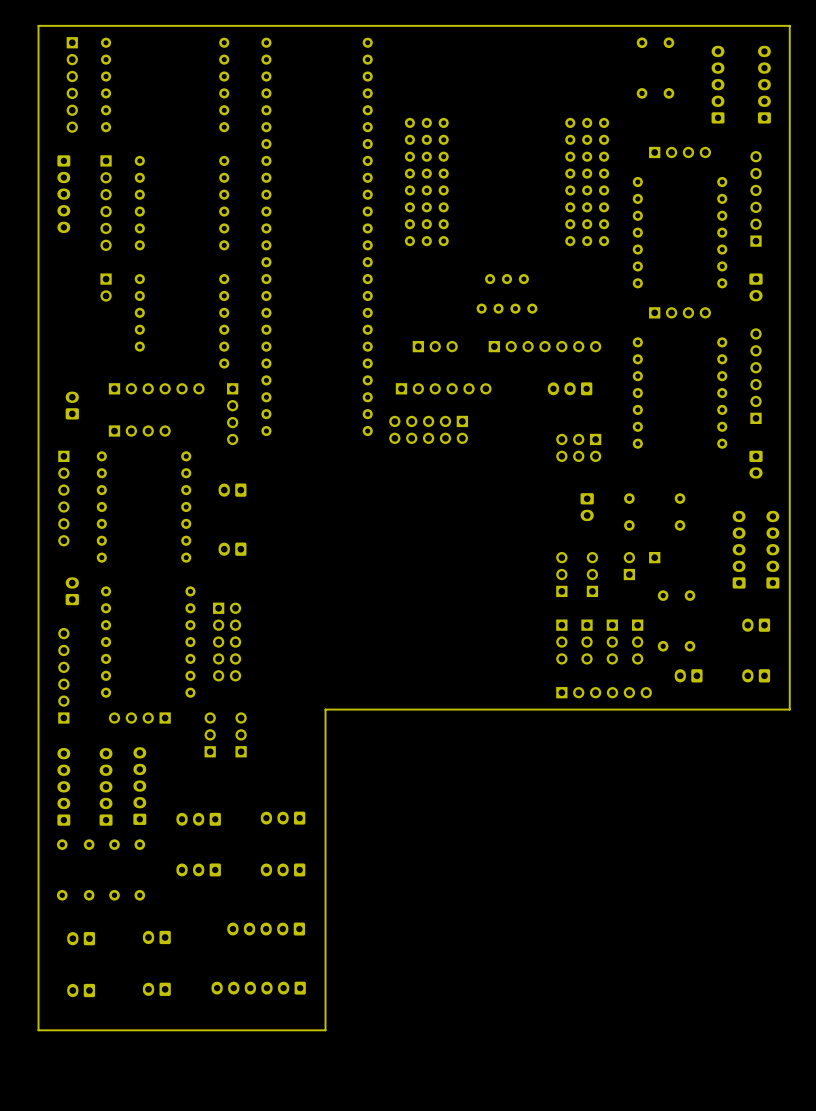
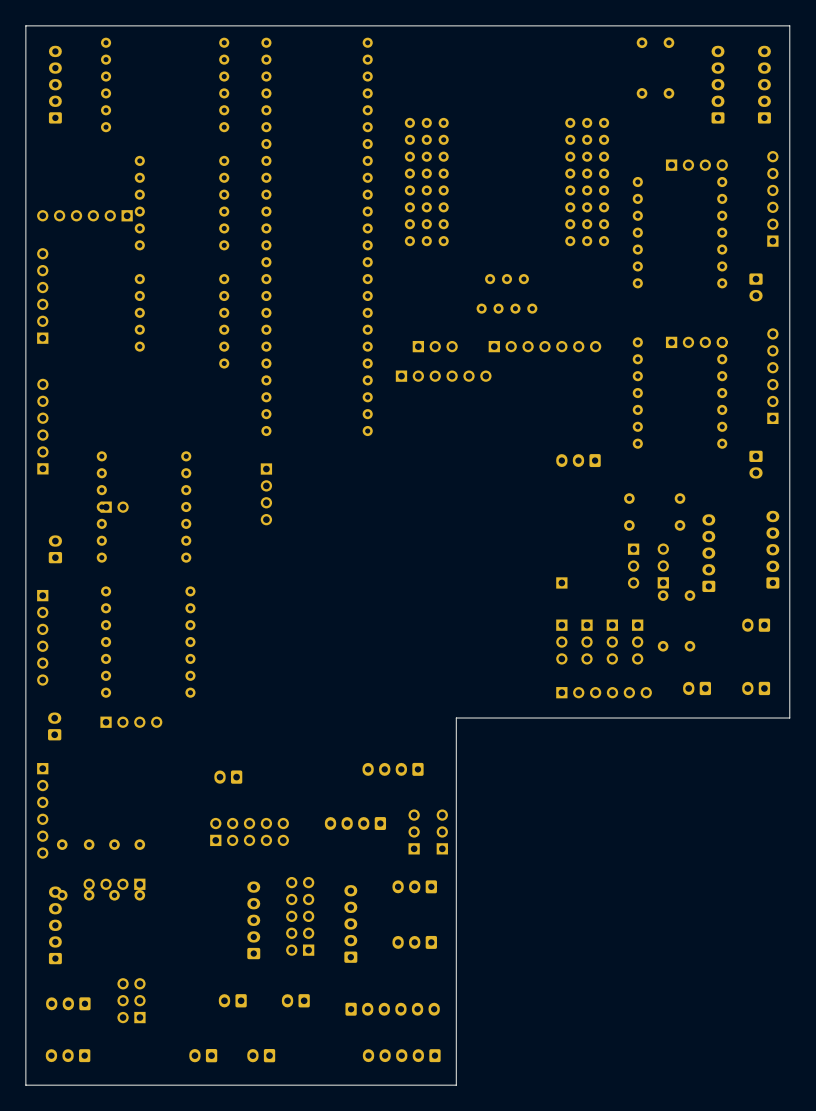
board edge: (38, 25) (38, 1030) (325, 1030) (325, 709) (789, 709) -> (38, 25) (25, 25) (25, 1085) (456, 1085) (456, 718) (789, 718) (789, 709)
part: (72, 84) -> none
part position: (680, 152) -> (696, 165)
part rotation: 0° (63, 194) -> 180° (55, 84)
part position: (63, 194) -> (55, 84)
part position: (755, 198) -> (772, 198)
part rotation: 0° (106, 203) -> 90° clockwise (84, 215)
part: (106, 287) -> none
part: none -> (42, 295)
part position: (680, 312) -> (696, 342)
part position: (755, 376) -> (772, 376)
part: (156, 388) -> none
part position: (443, 388) -> (443, 376)
part position: (570, 388) -> (578, 460)
part: (72, 405) -> none
part: (232, 414) -> none
part: none -> (42, 426)
part: (428, 429) -> none
part: (139, 431) -> none
part: (578, 447) -> none
part: (232, 490) -> none
part: none -> (266, 494)
part: (63, 498) -> none
part: none -> (114, 507)
part: (587, 507) -> none
part: (232, 549) -> none
part position: (739, 549) -> (708, 553)
part footprint: [623, 551, 636, 581] -> [627, 543, 640, 589]
part position: (654, 557) -> (561, 582)
part: none -> (663, 565)
part: (561, 574) -> none
part: (592, 574) -> none
part position: (72, 591) -> (55, 549)
part: (227, 642) -> none
part rotation: 0° (63, 675) -> 180° (42, 637)
part position: (688, 675) -> (697, 688)
part position: (756, 675) -> (756, 688)
part rotation: 0° (139, 718) -> 180° (131, 722)
part: none -> (54, 726)
part: (210, 734) -> none
part: (241, 734) -> none
part: none -> (393, 769)
part: none -> (228, 777)
part: (63, 786) -> none
part: (106, 786) -> none
part: (139, 786) -> none
part: none -> (42, 810)
part: (283, 818) -> none
part: (198, 819) -> none
part: none -> (355, 823)
part: none -> (249, 831)
part: none -> (414, 831)
part: none -> (442, 831)
part: (198, 869) -> none
part: (283, 869) -> none
part: none -> (114, 884)
part: none -> (414, 886)
part: none -> (300, 916)
part: none -> (350, 923)
part: none -> (55, 925)
part rotation: 0° (266, 929) -> 90° clockwise (253, 920)
part: (156, 937) -> none
part: (81, 938) -> none
part: none -> (414, 942)
part rotation: 0° (258, 988) -> 180° (392, 1009)
part position: (258, 988) -> (392, 1009)
part: (156, 989) -> none
part: (81, 990) -> none
part: none -> (131, 1000)
part: none -> (232, 1000)
part: none -> (295, 1000)
part: none -> (68, 1003)
part: none -> (68, 1055)
part: none -> (203, 1055)
part: none -> (261, 1055)
part: none -> (401, 1055)

